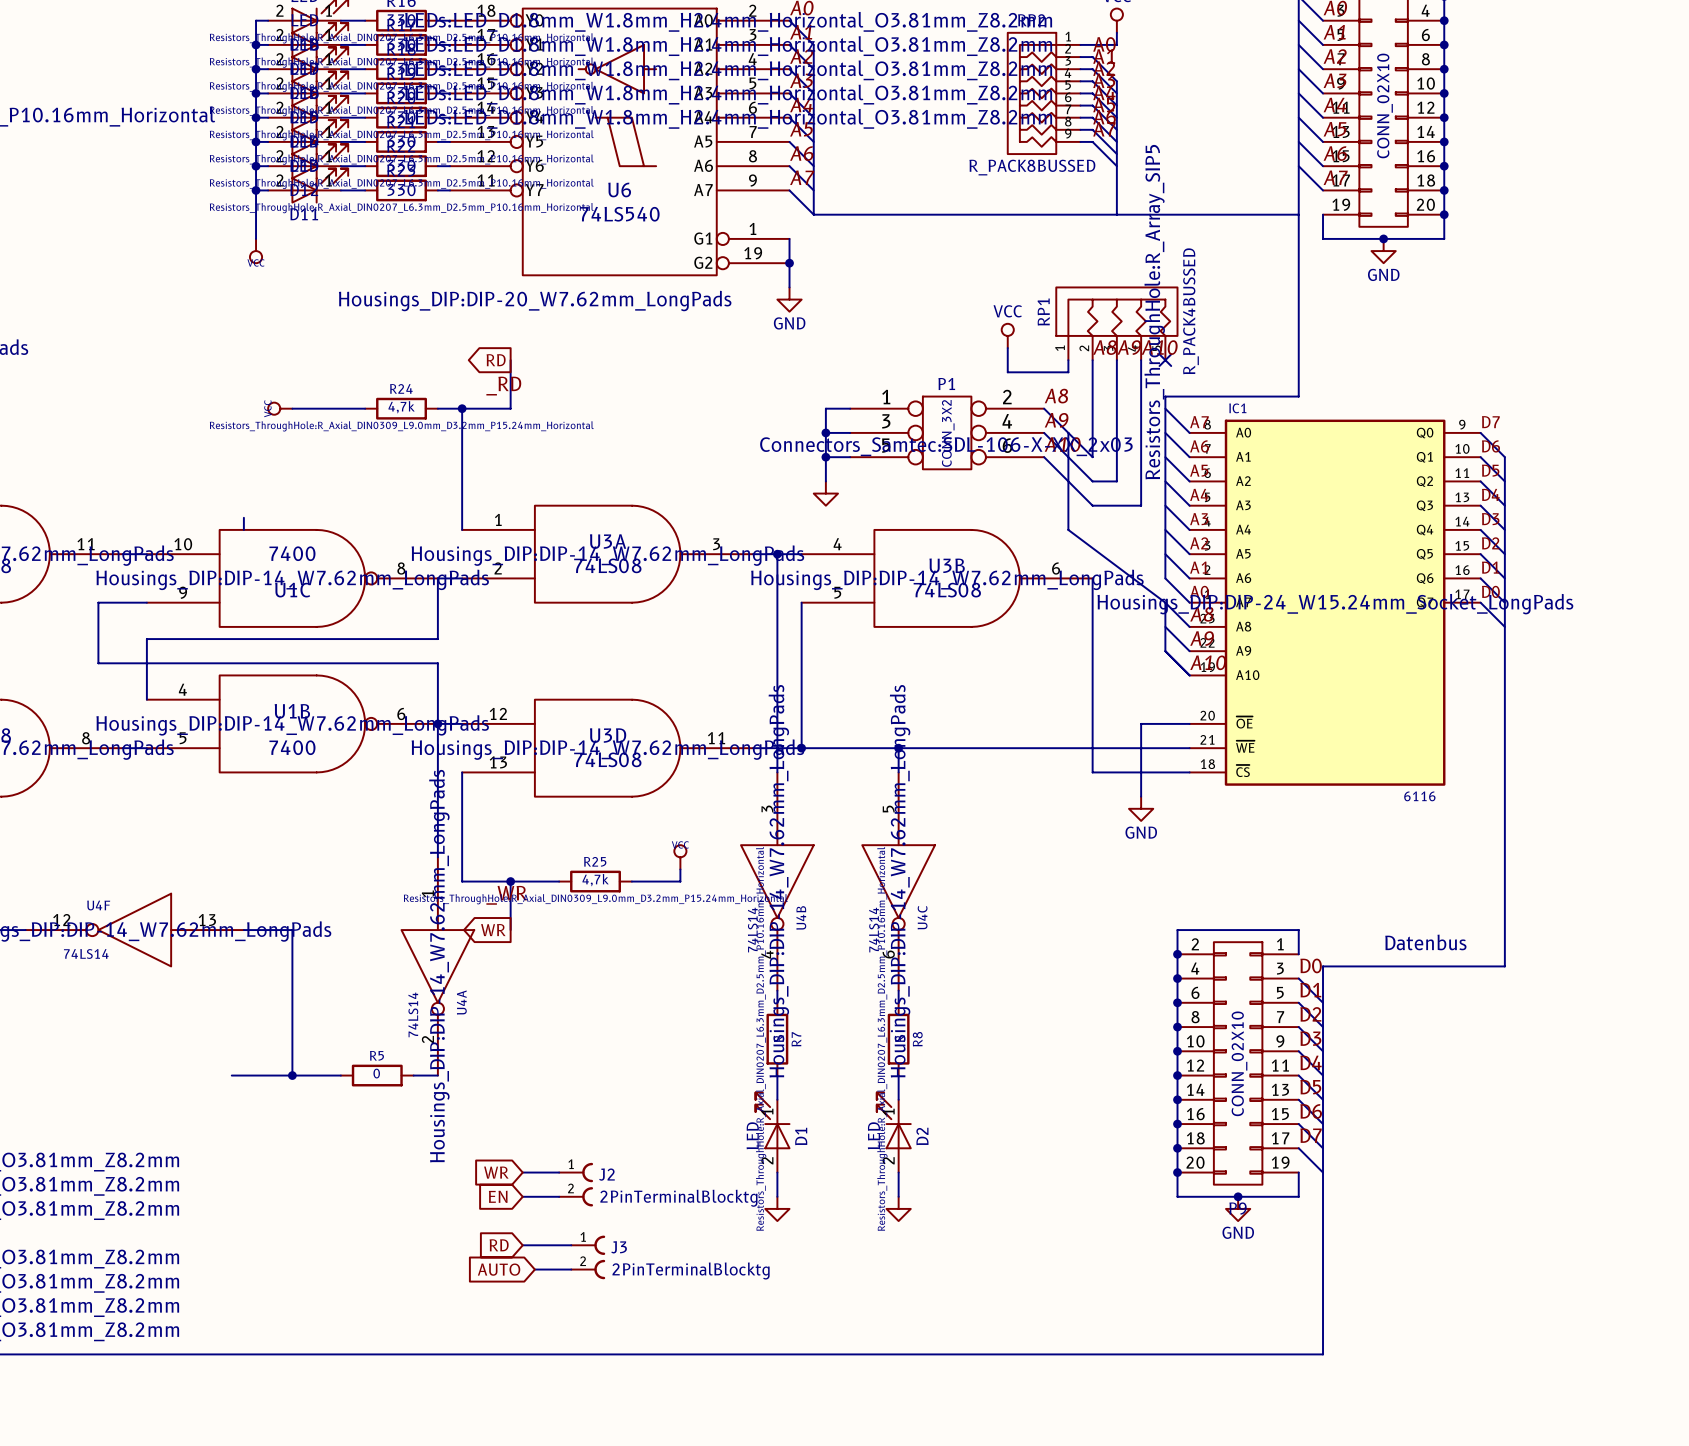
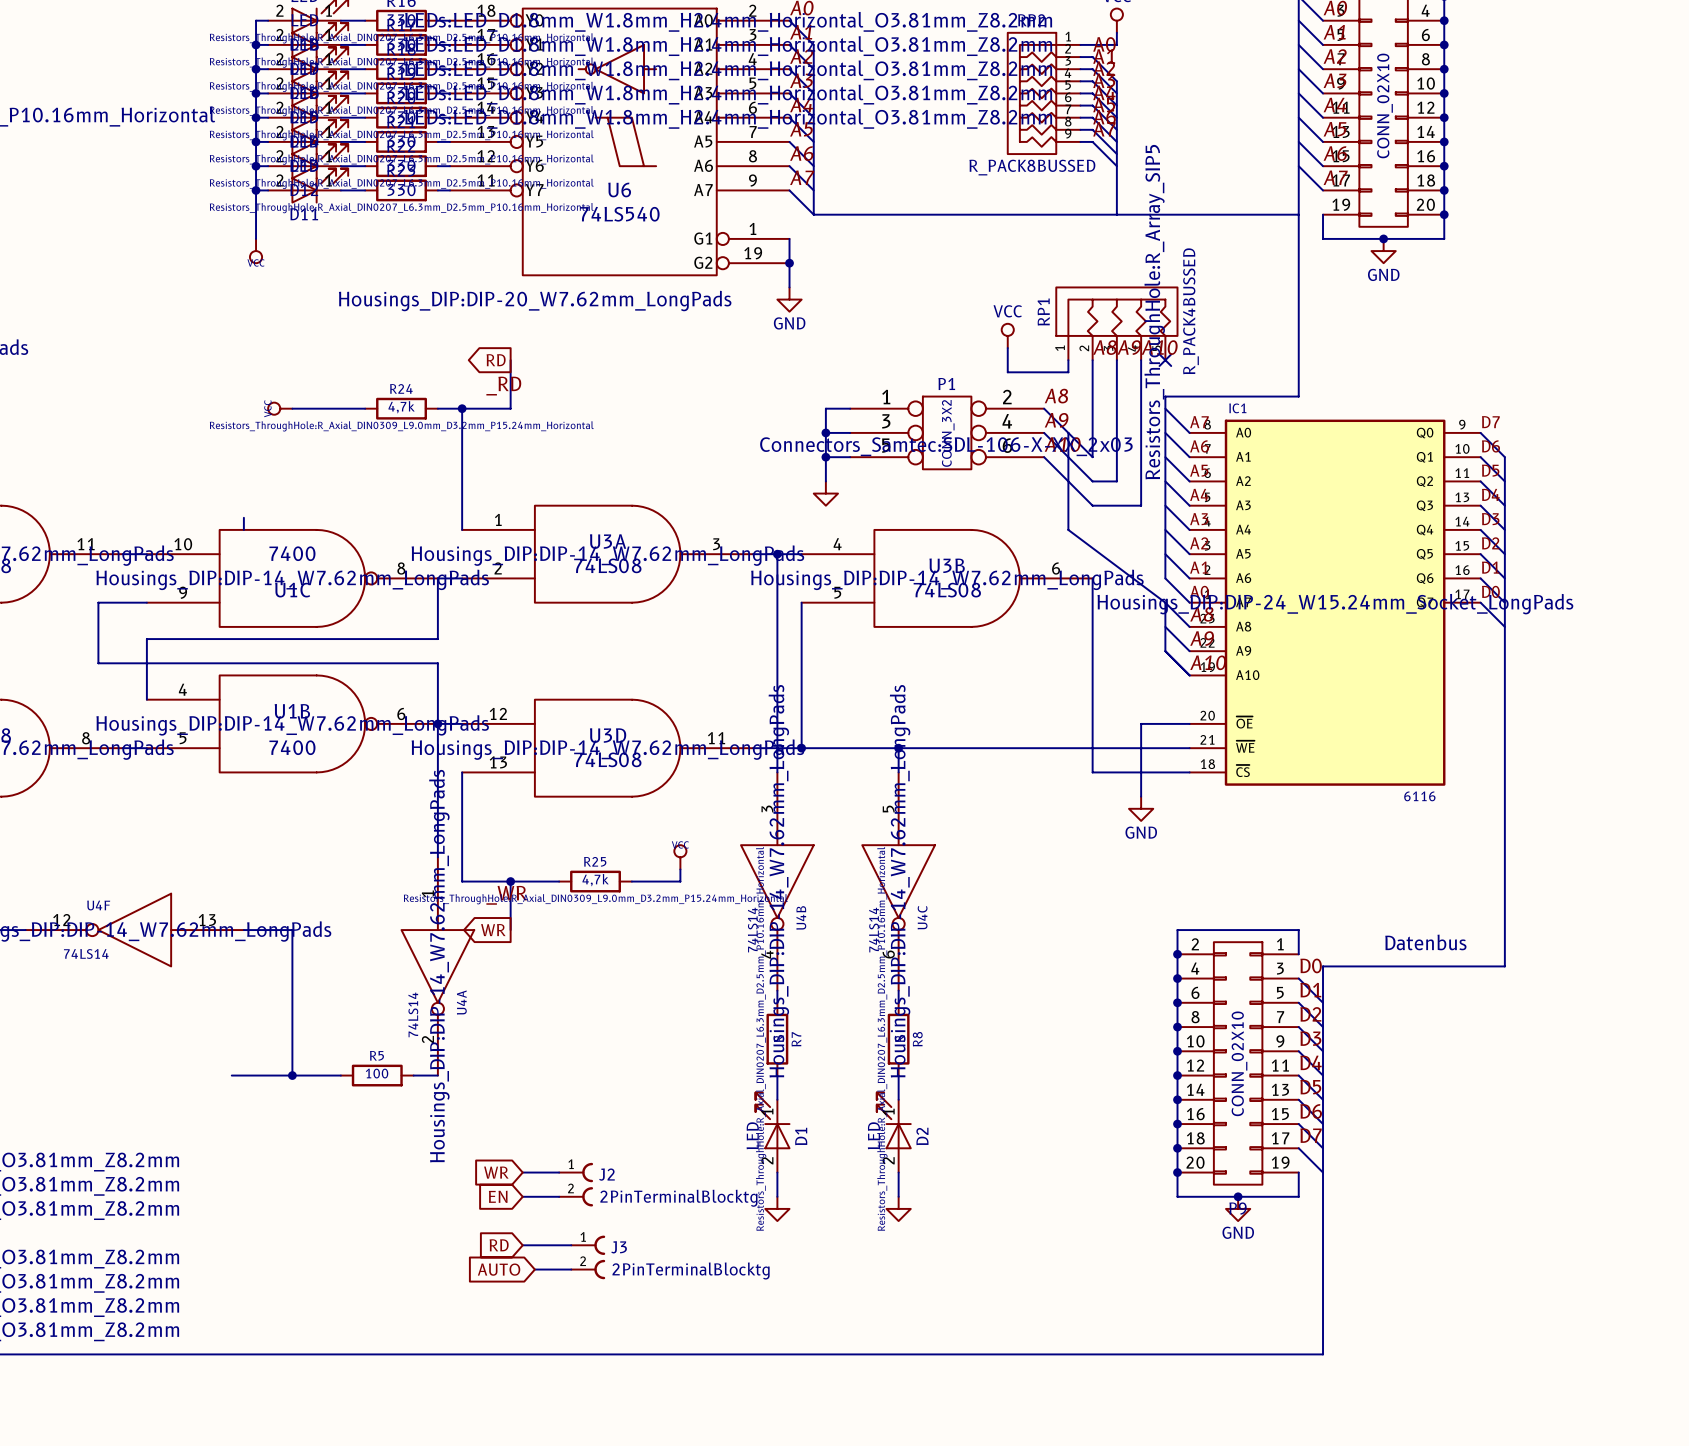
R5 value: 0 (376, 1073) -> 100 (377, 1073)

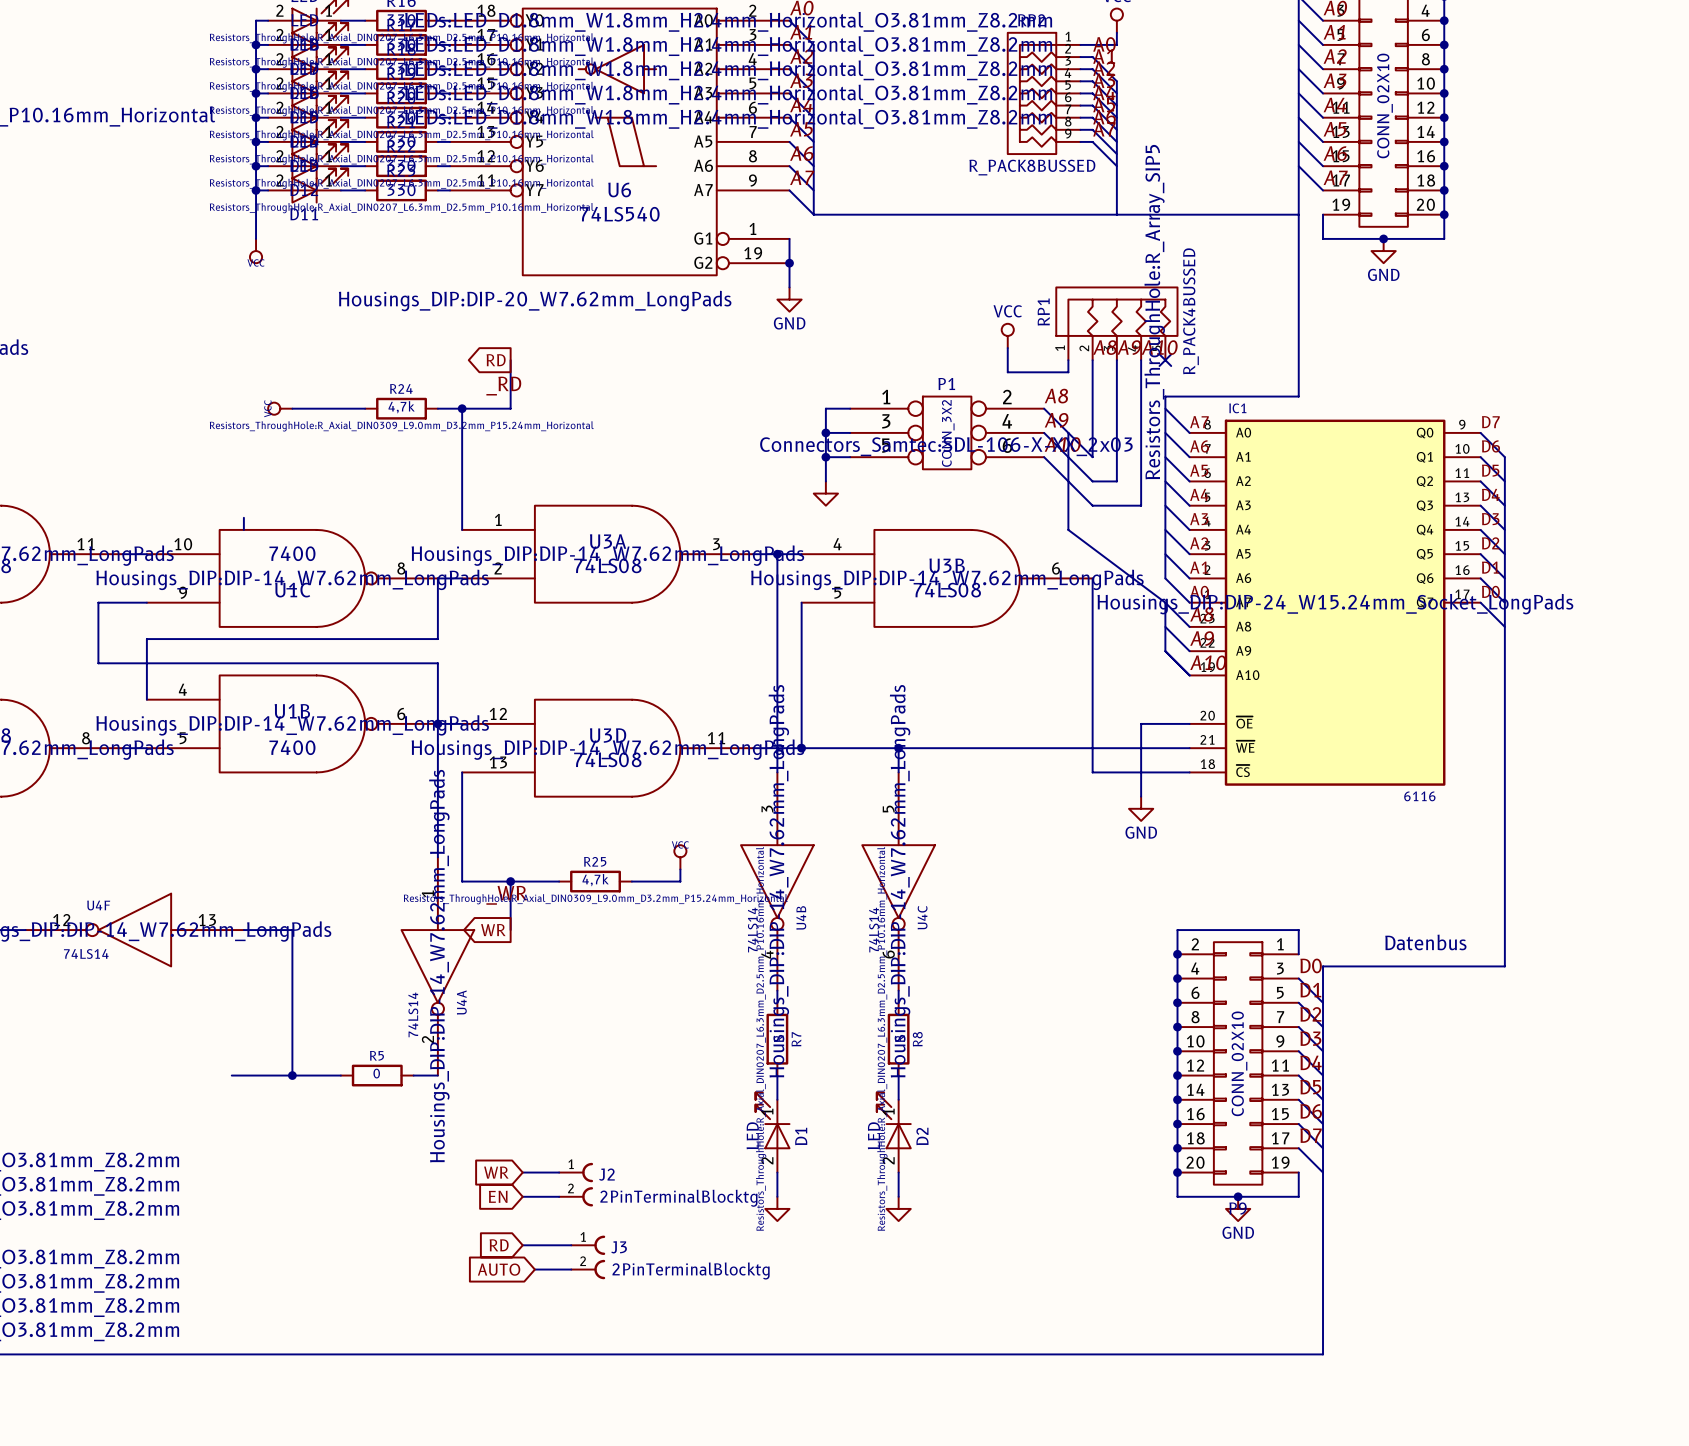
R5 value: 100 (377, 1073) -> 0 (376, 1073)

